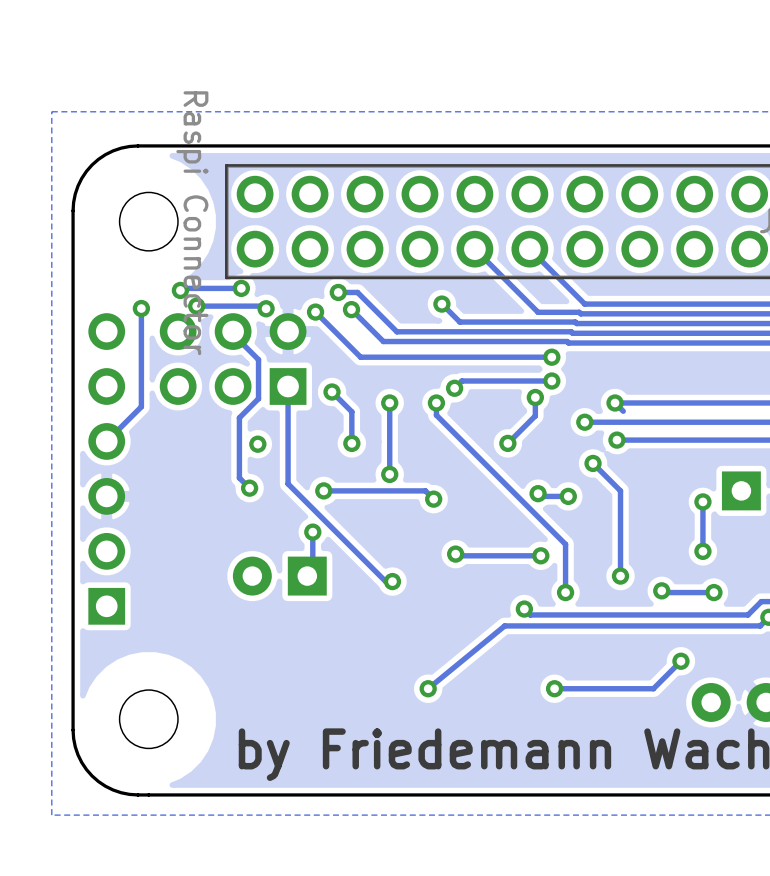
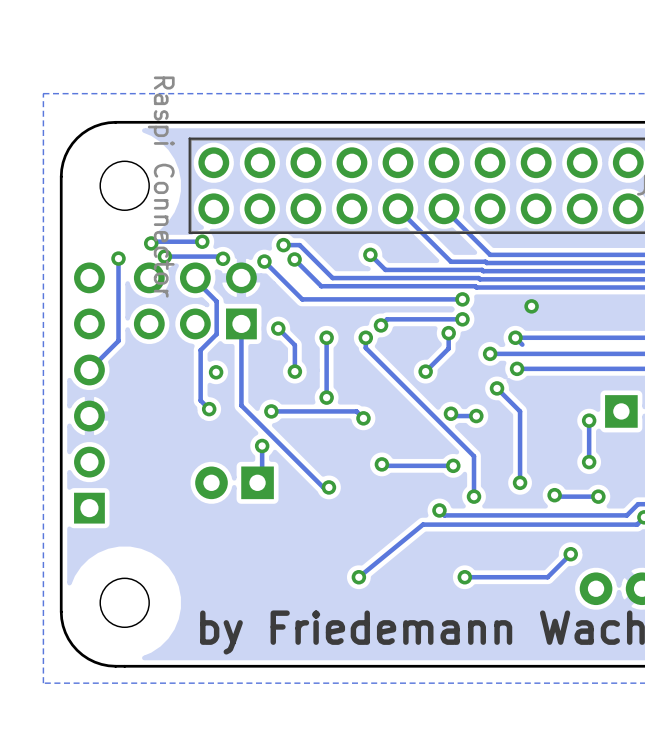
via: none -> (531, 306)

